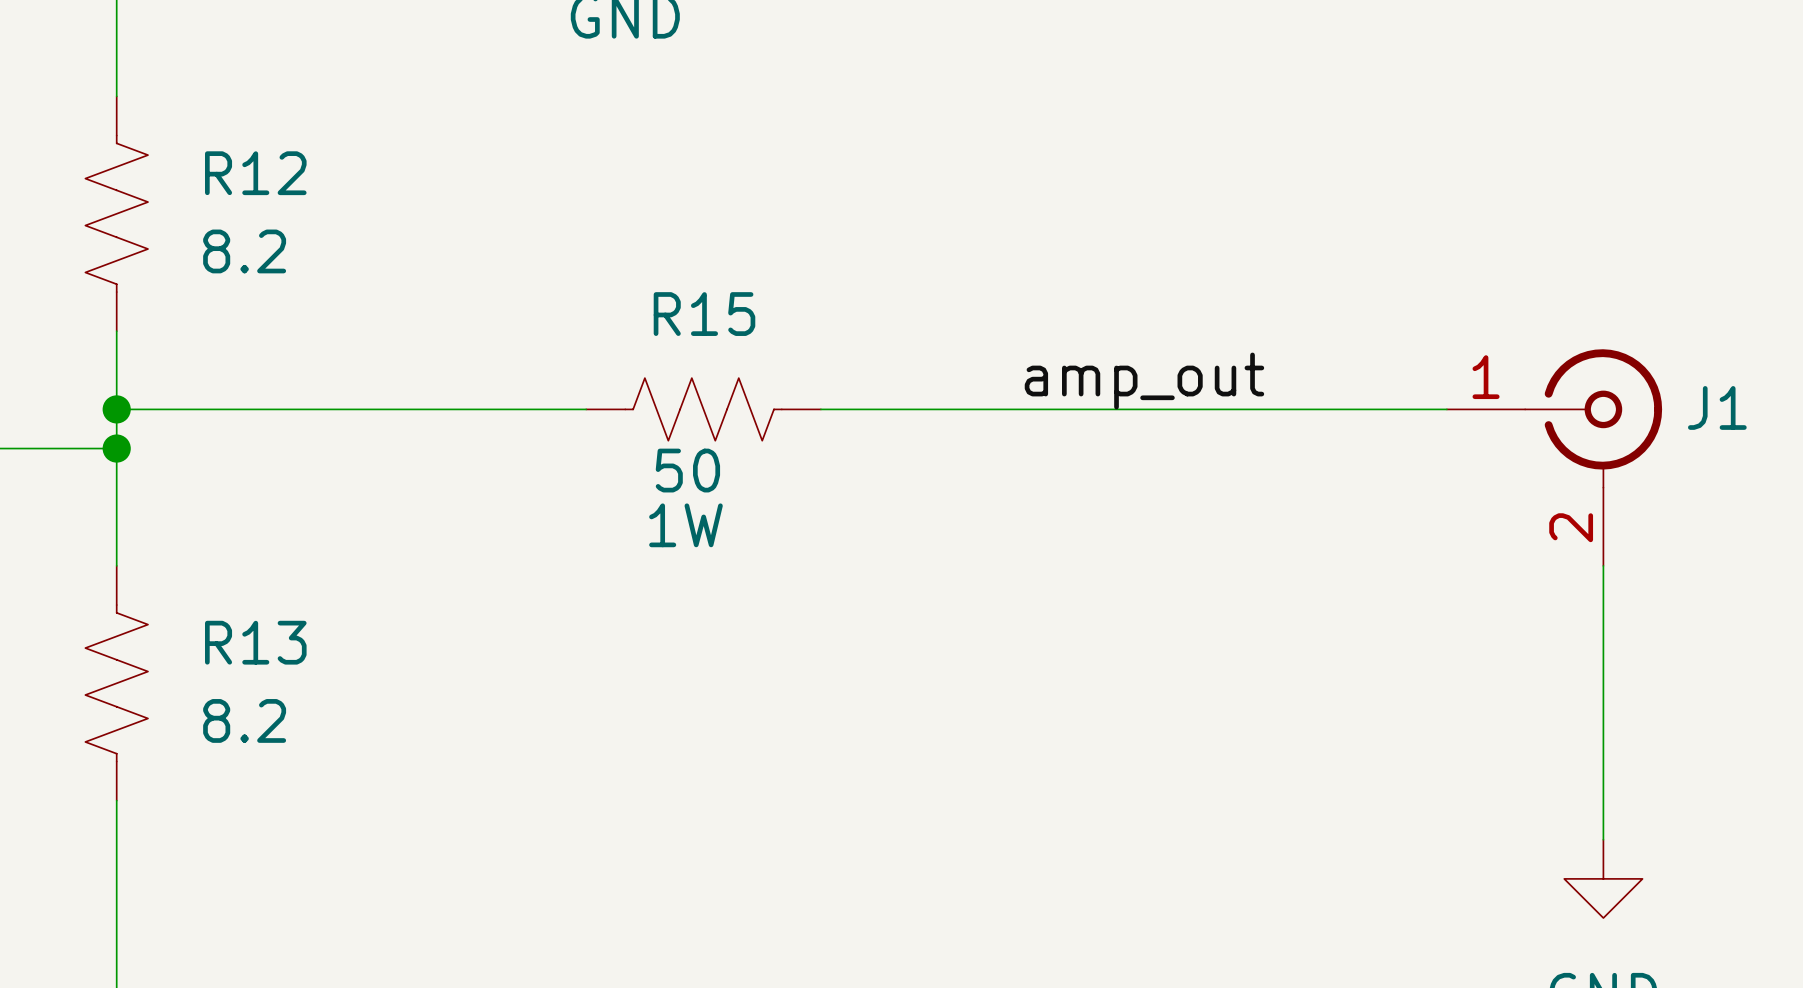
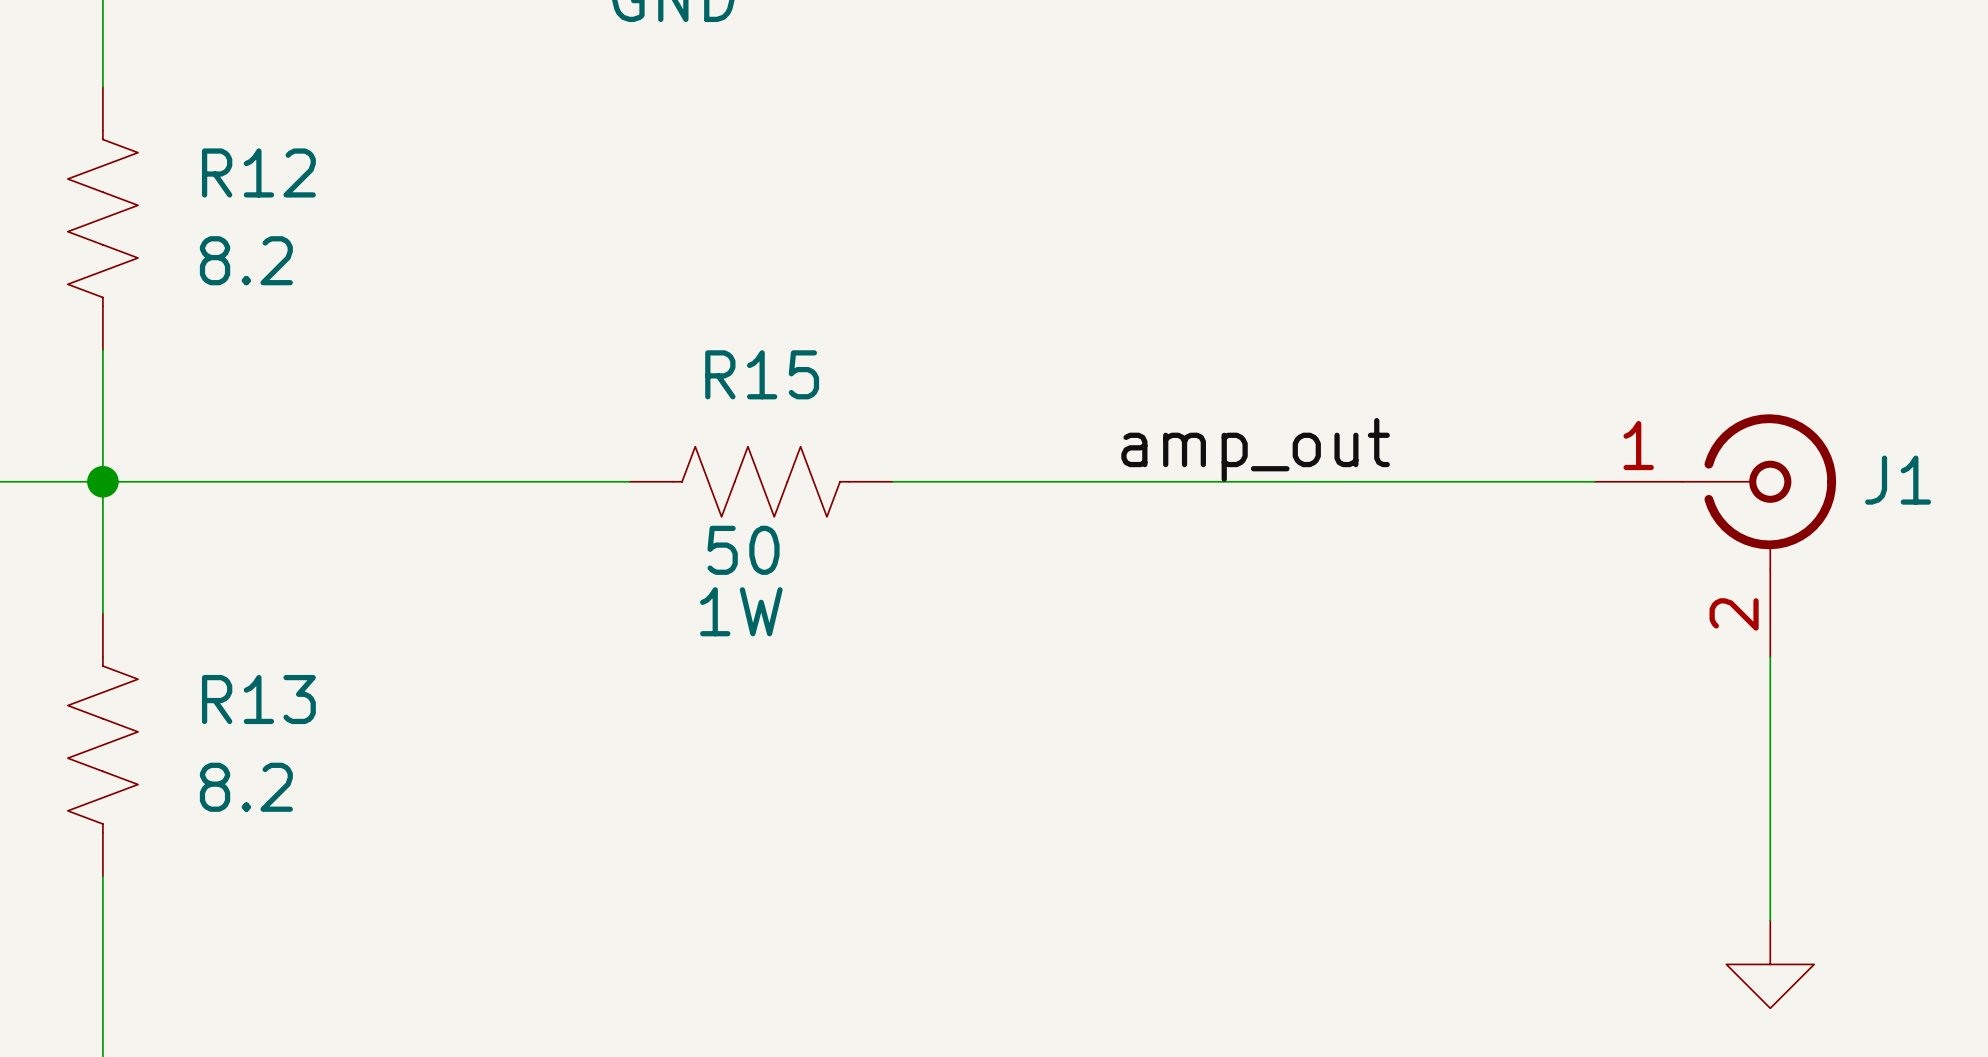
label position: amp_out (1144, 381) -> amp_out (1255, 449)
wire: (116, 409) (586, 409) -> (102, 481) (629, 481)
junction: (116, 409) -> none
R15 position: (703, 409) -> (761, 481)
wire: (820, 409) (1446, 409) -> (892, 481) (1594, 481)
J1 position: (1554, 457) -> (1715, 535)

